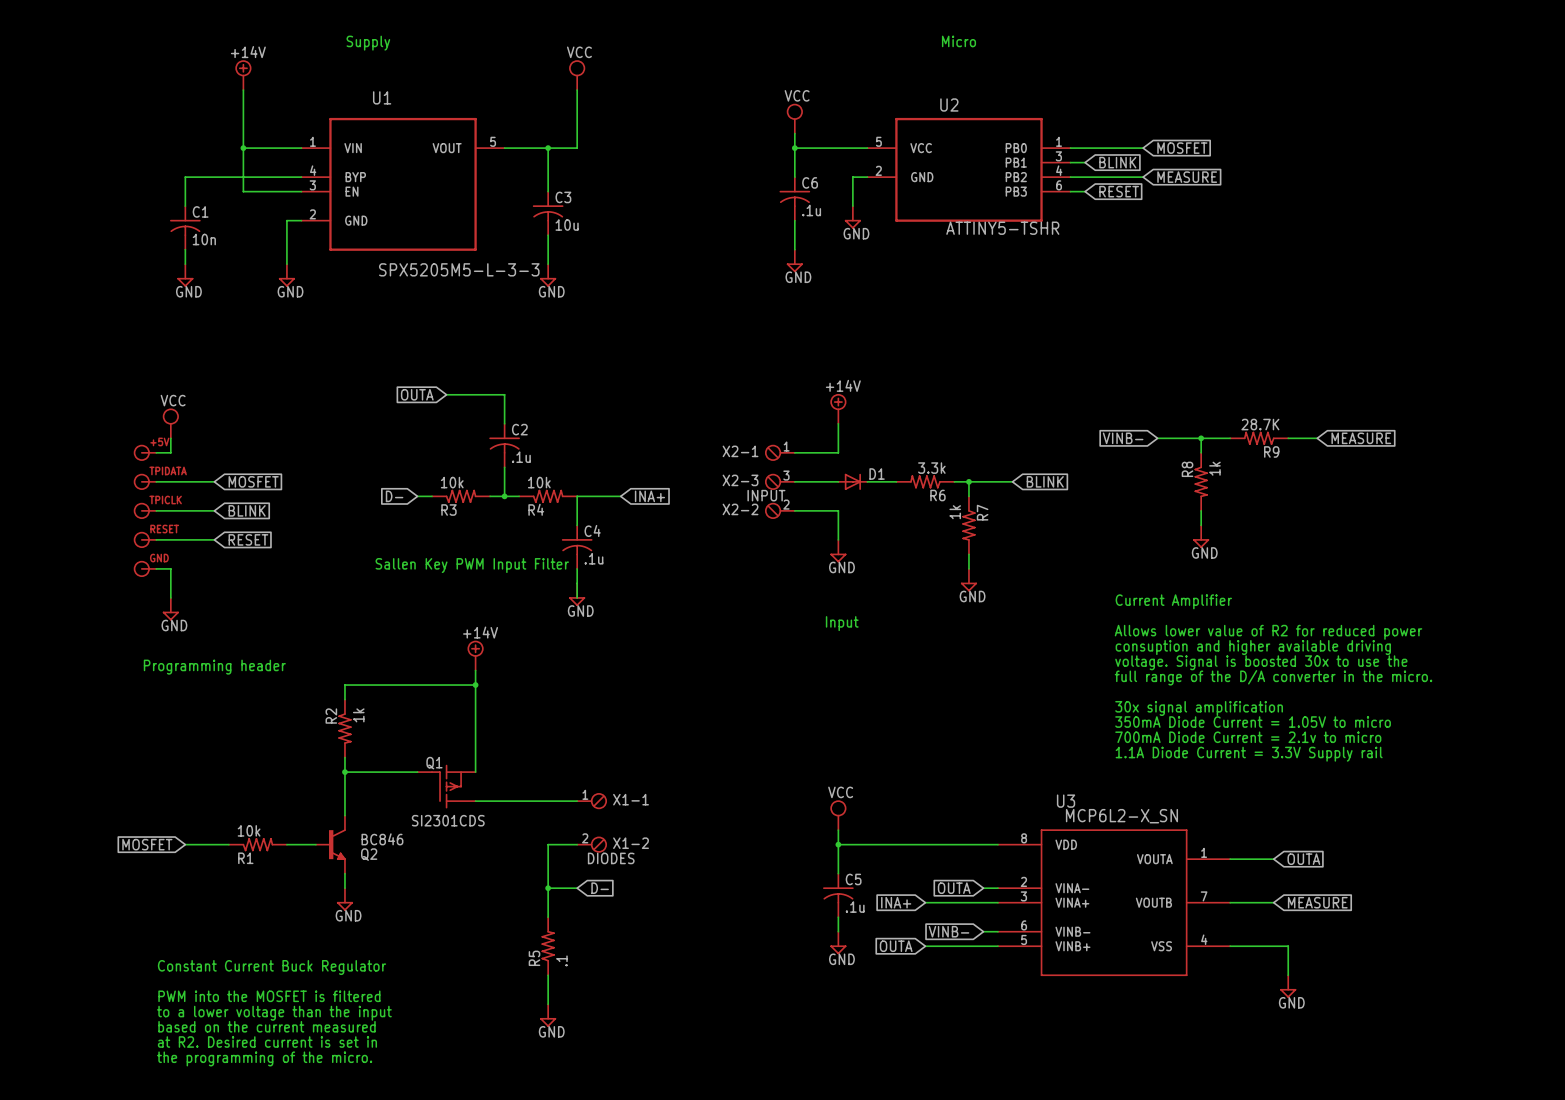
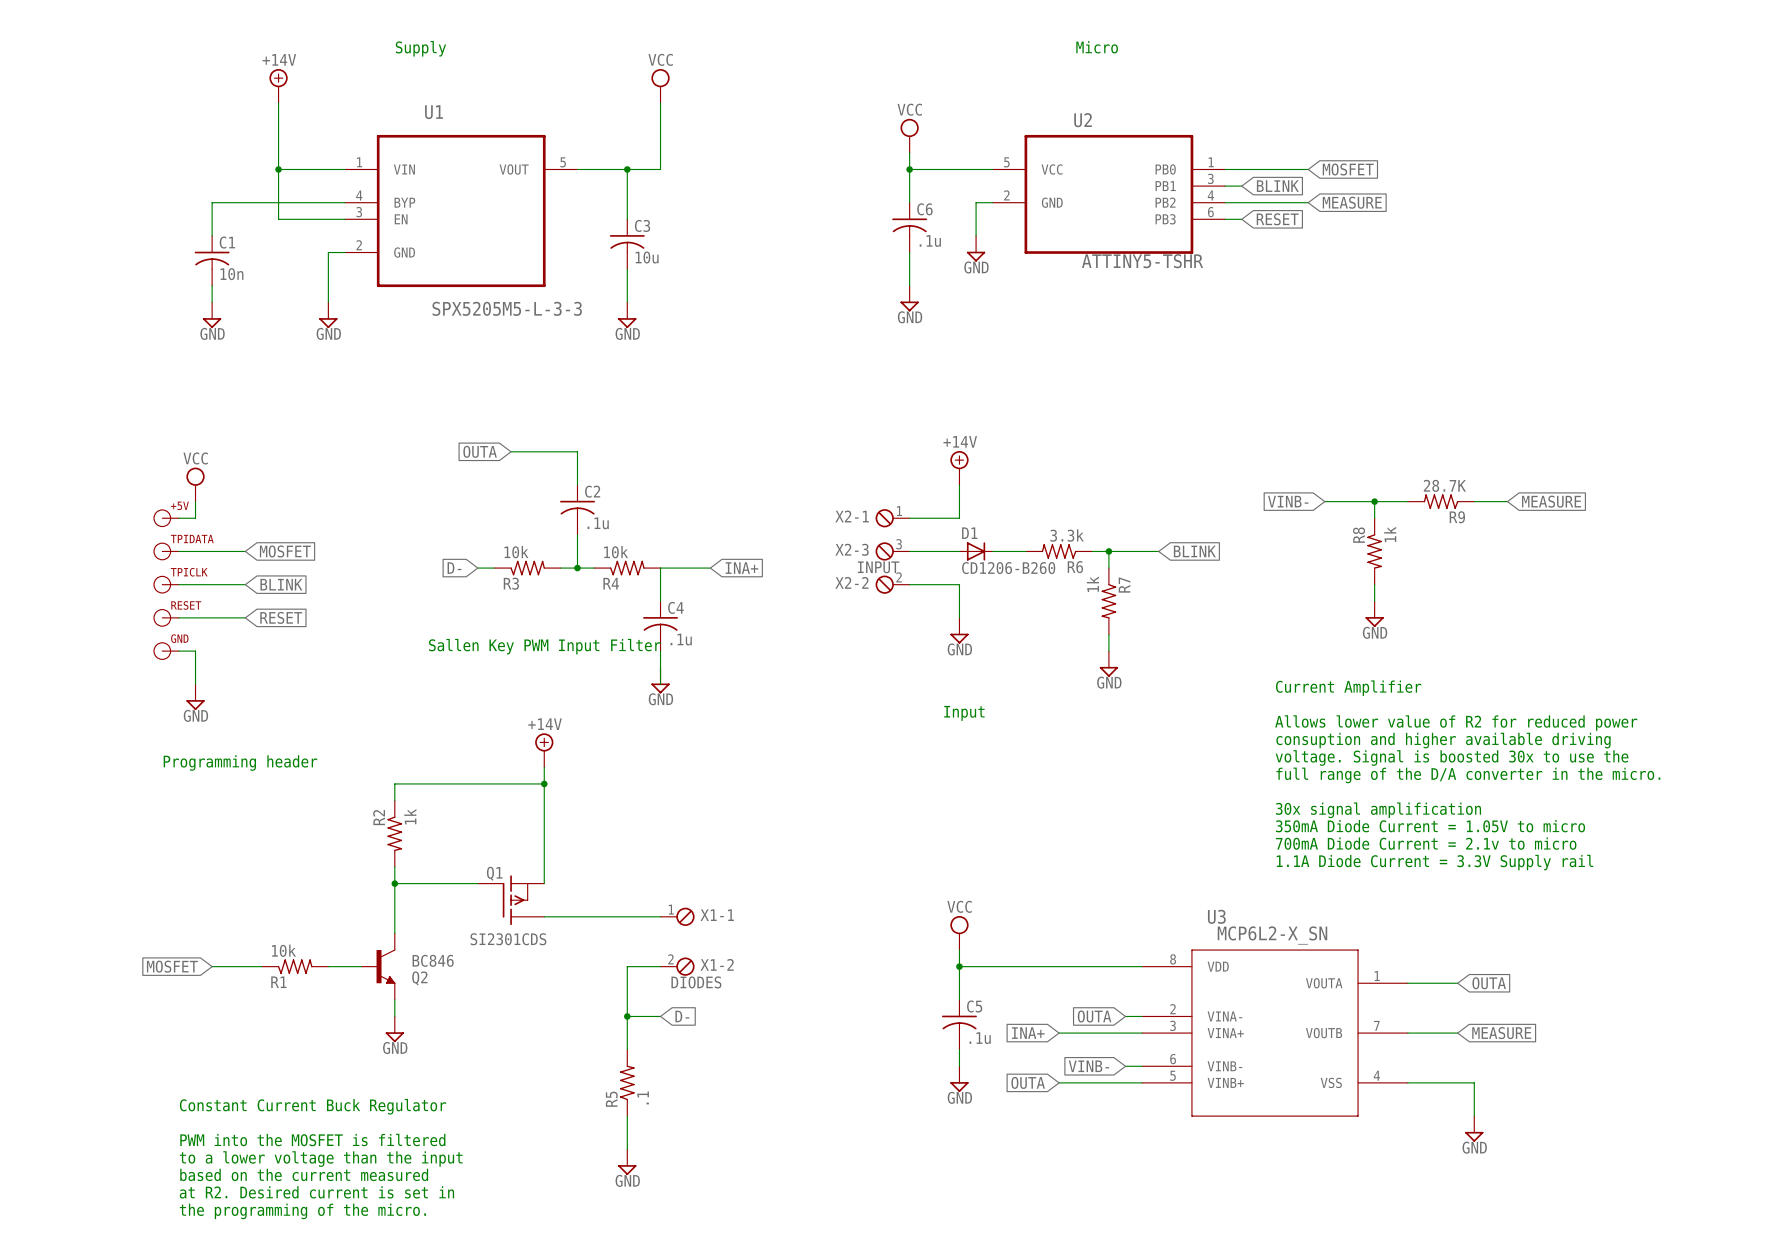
D1 name position: D1 (877, 474) -> D1 (969, 533)
D1 value: none -> CD1206-B260 (1008, 568)

